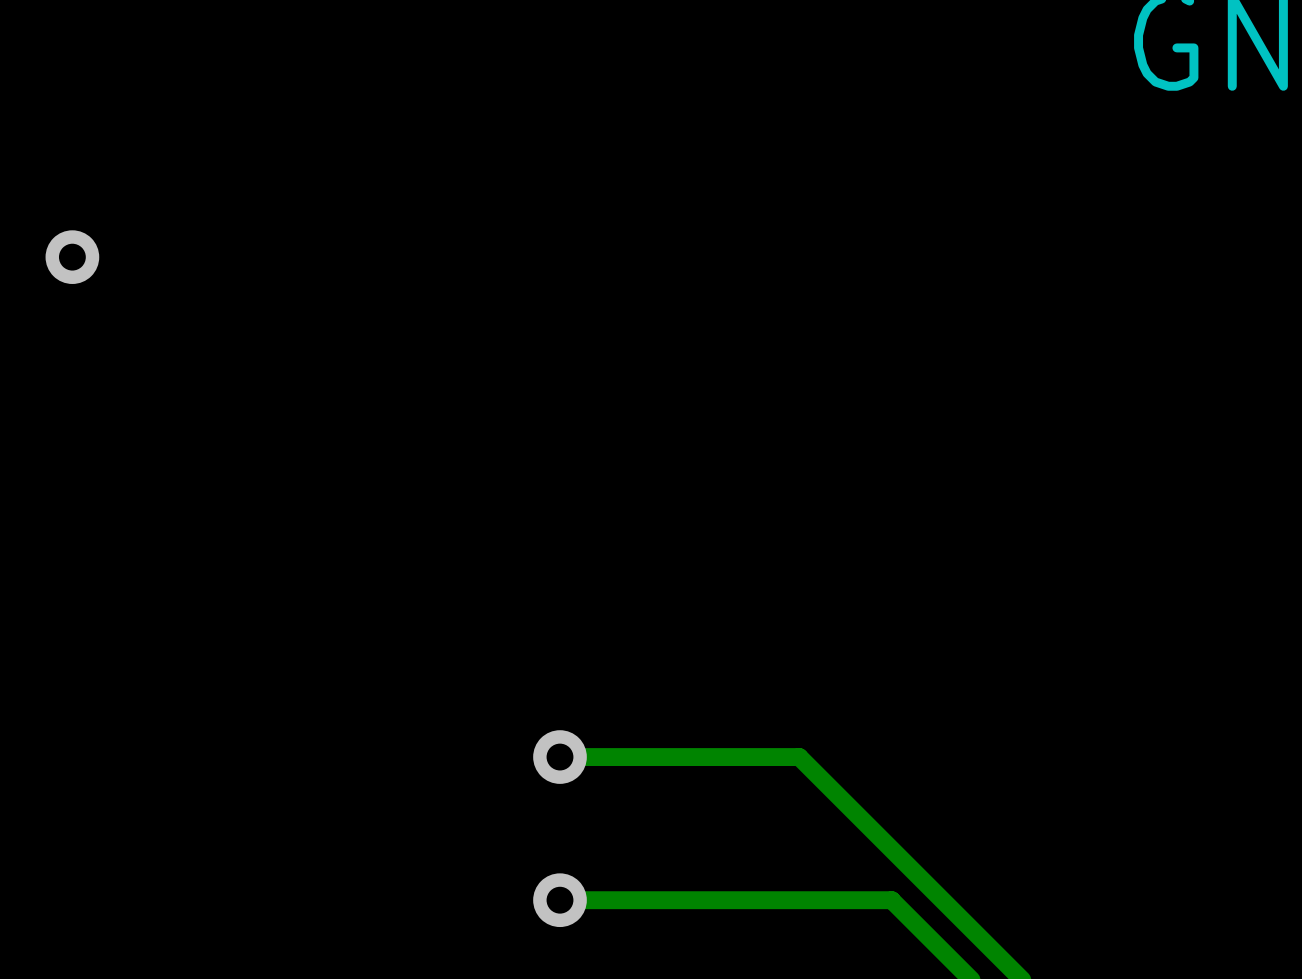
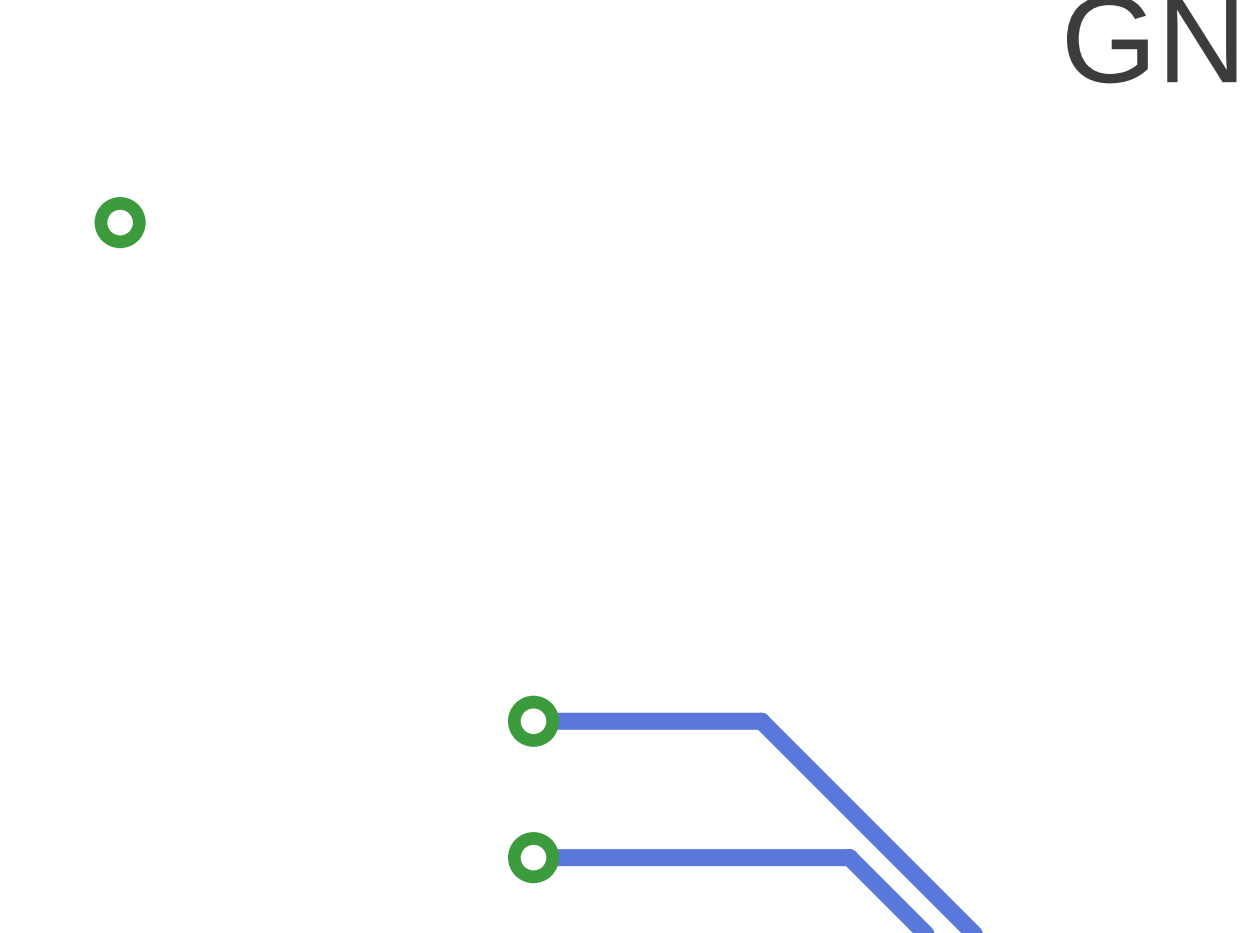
via position: (72, 257) -> (120, 222)

